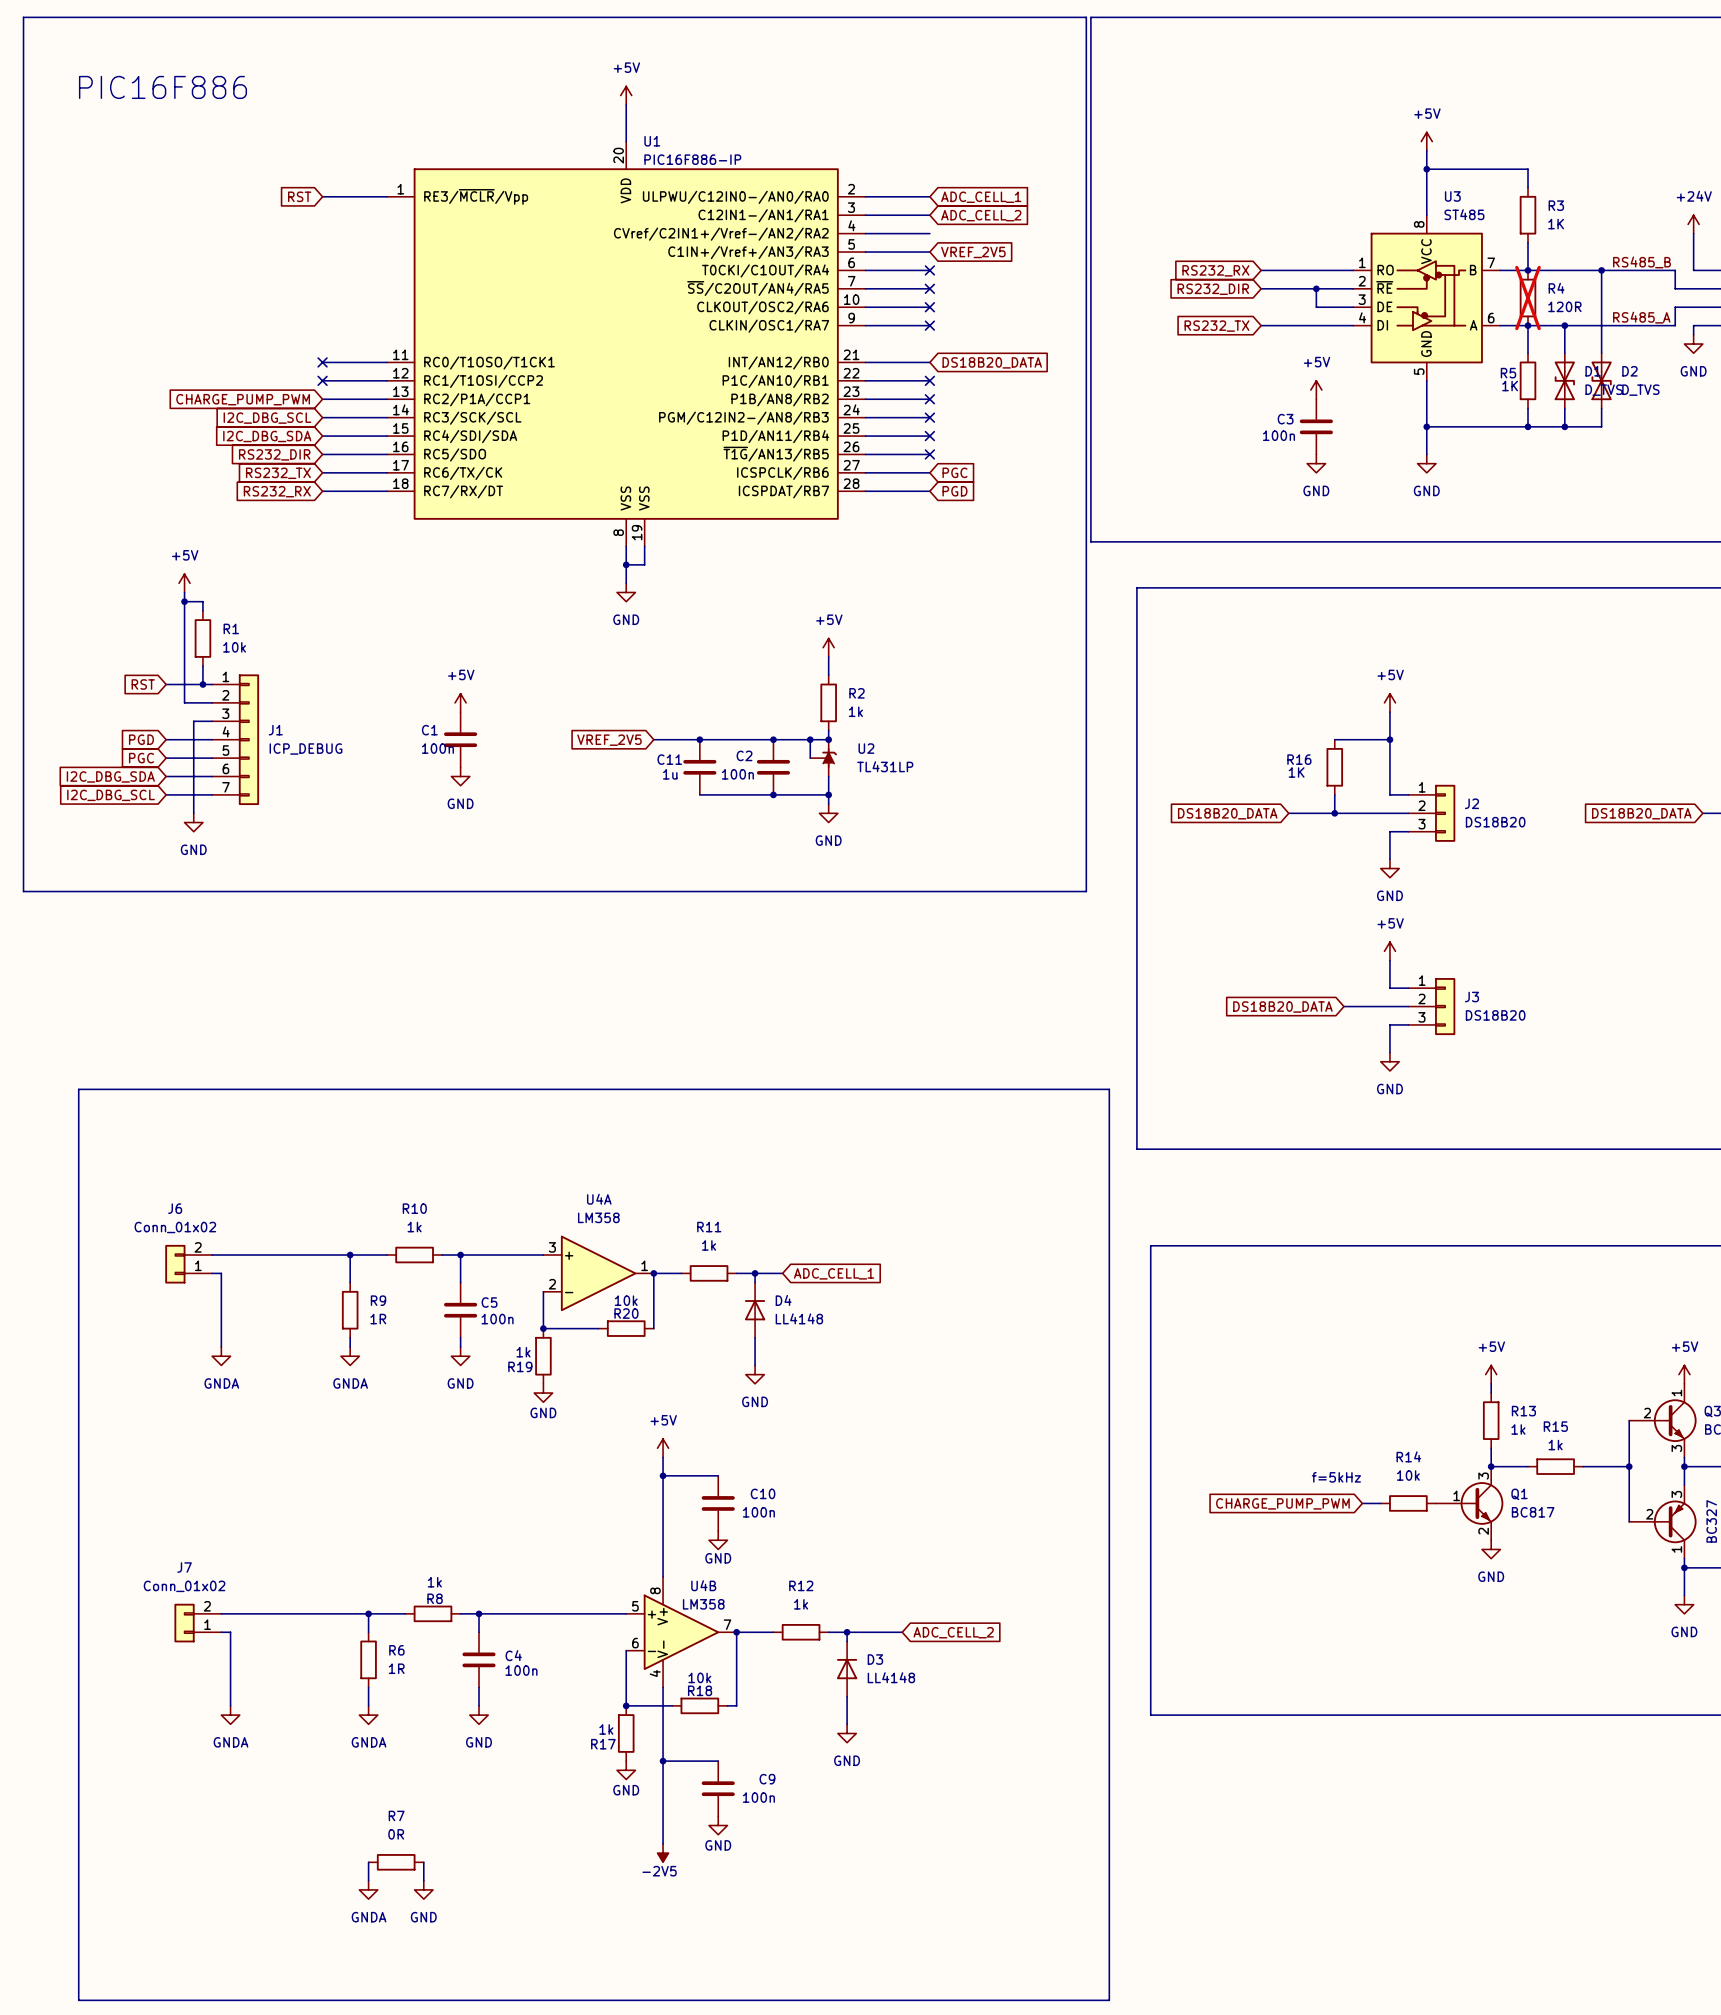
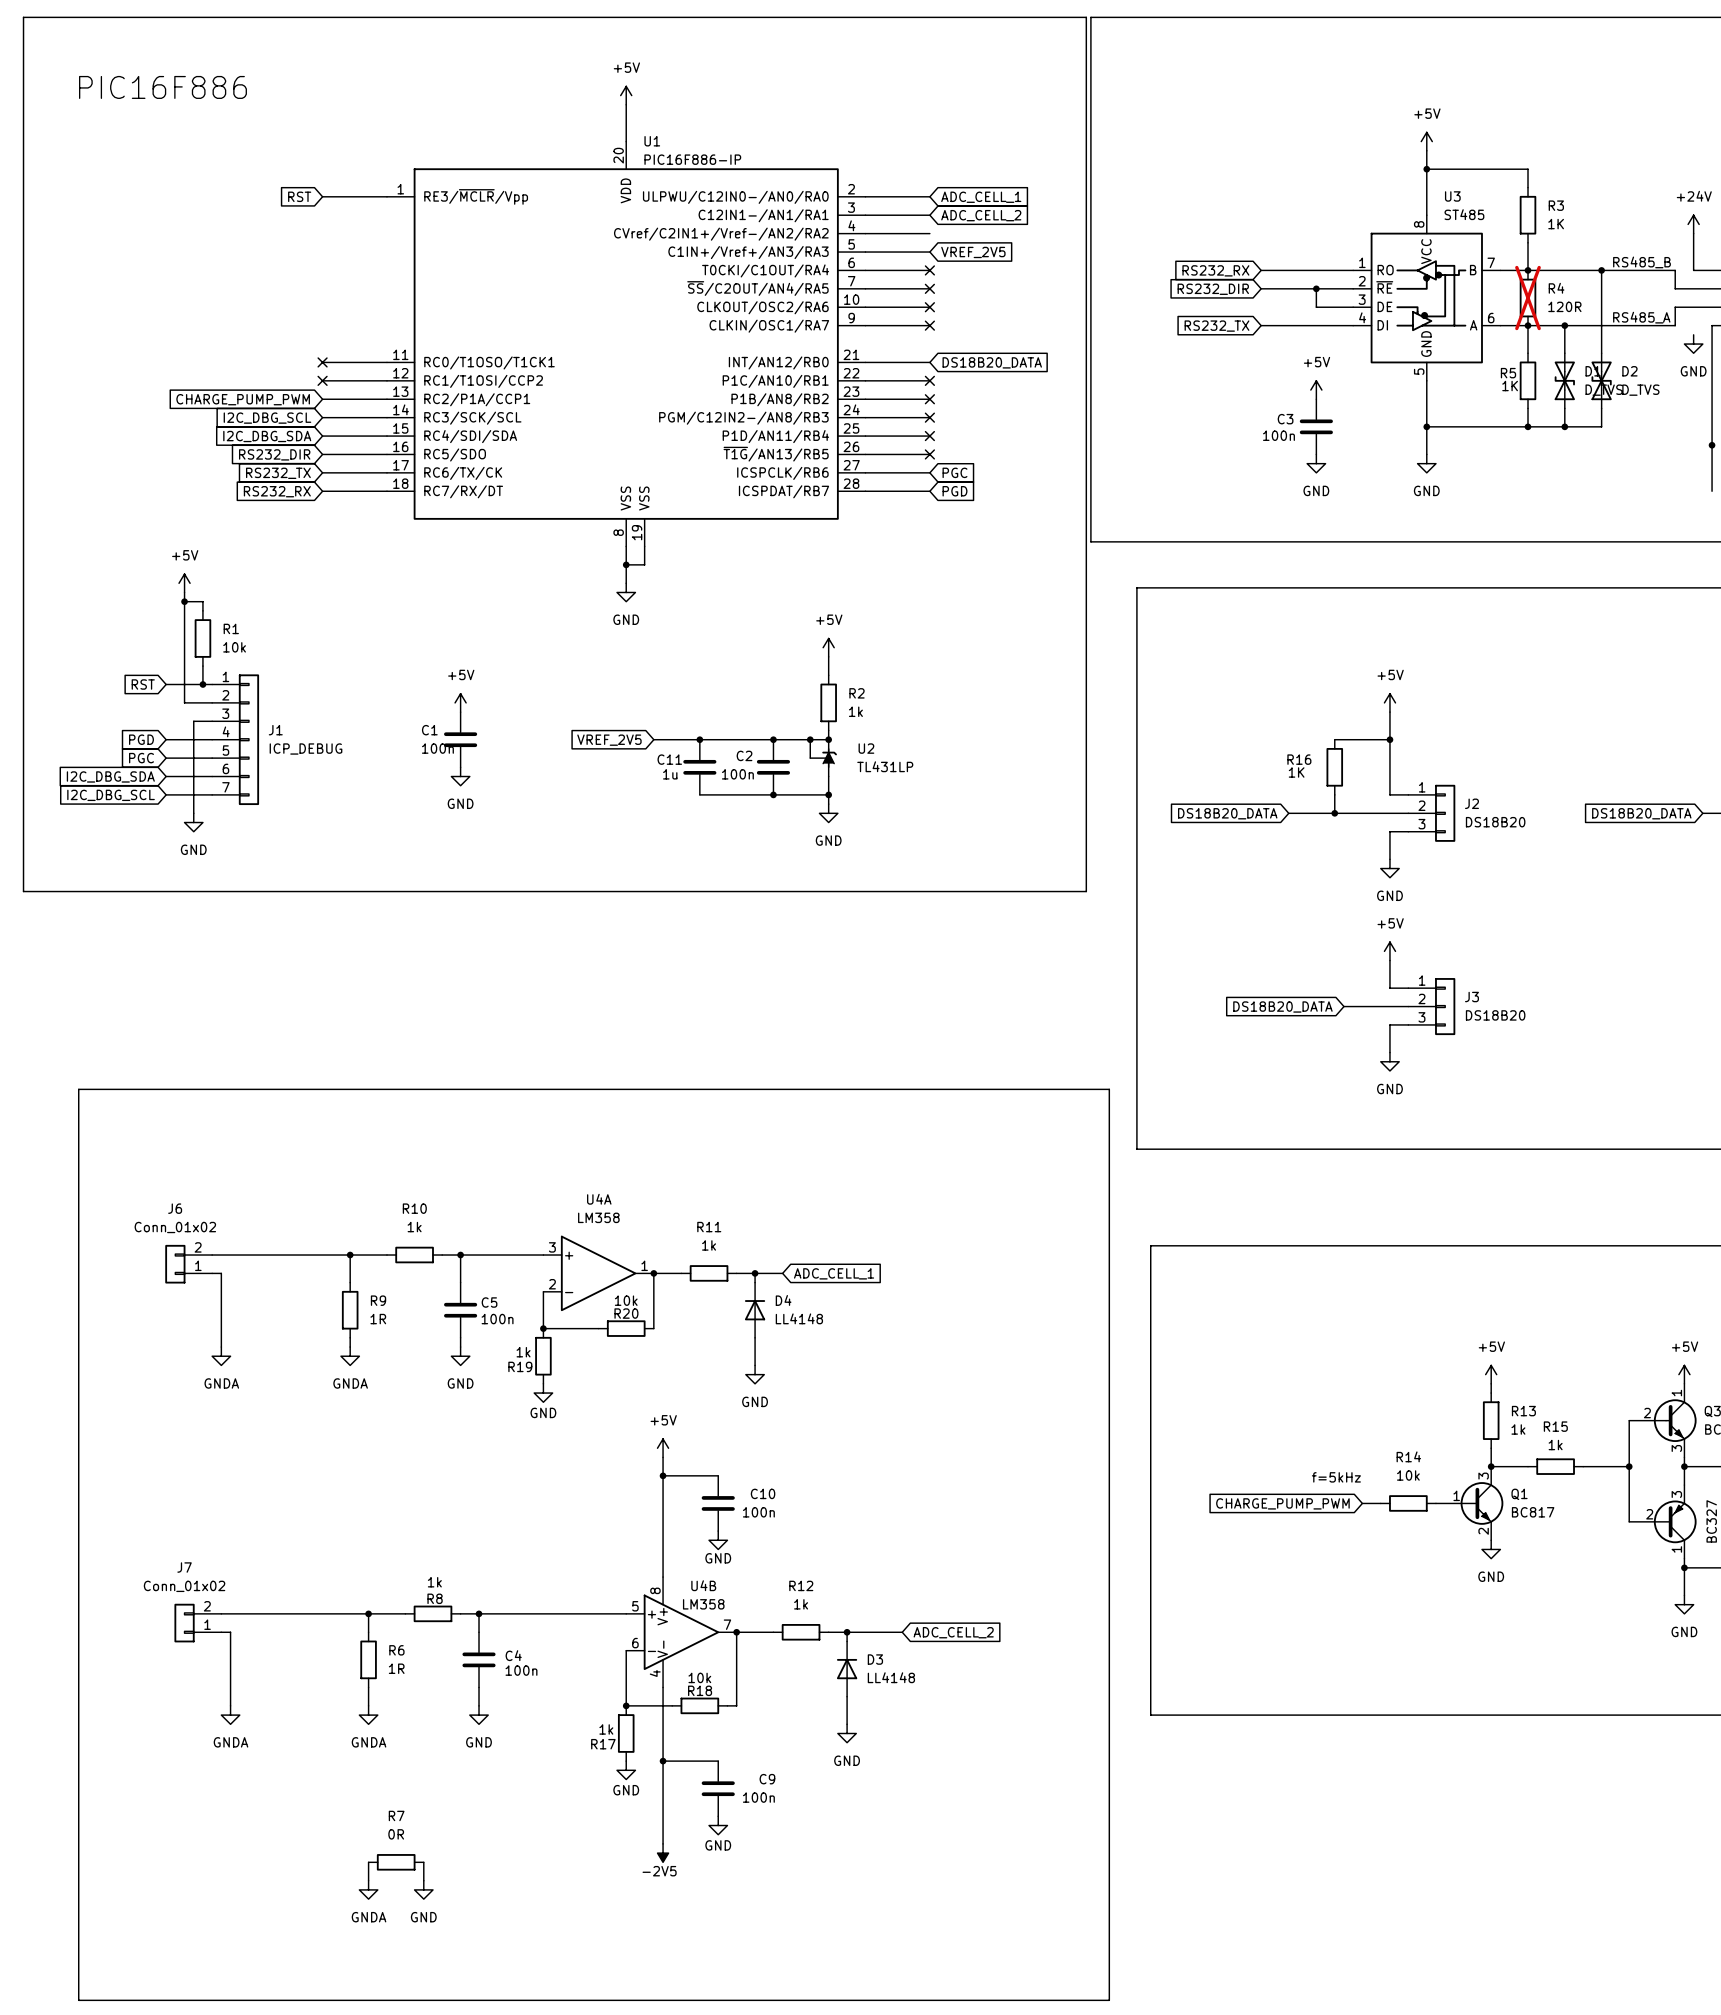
wire: (1712, 325) (1693, 325) (1693, 334) -> (1712, 325) (1712, 491)
junction: none -> (1712, 445)

